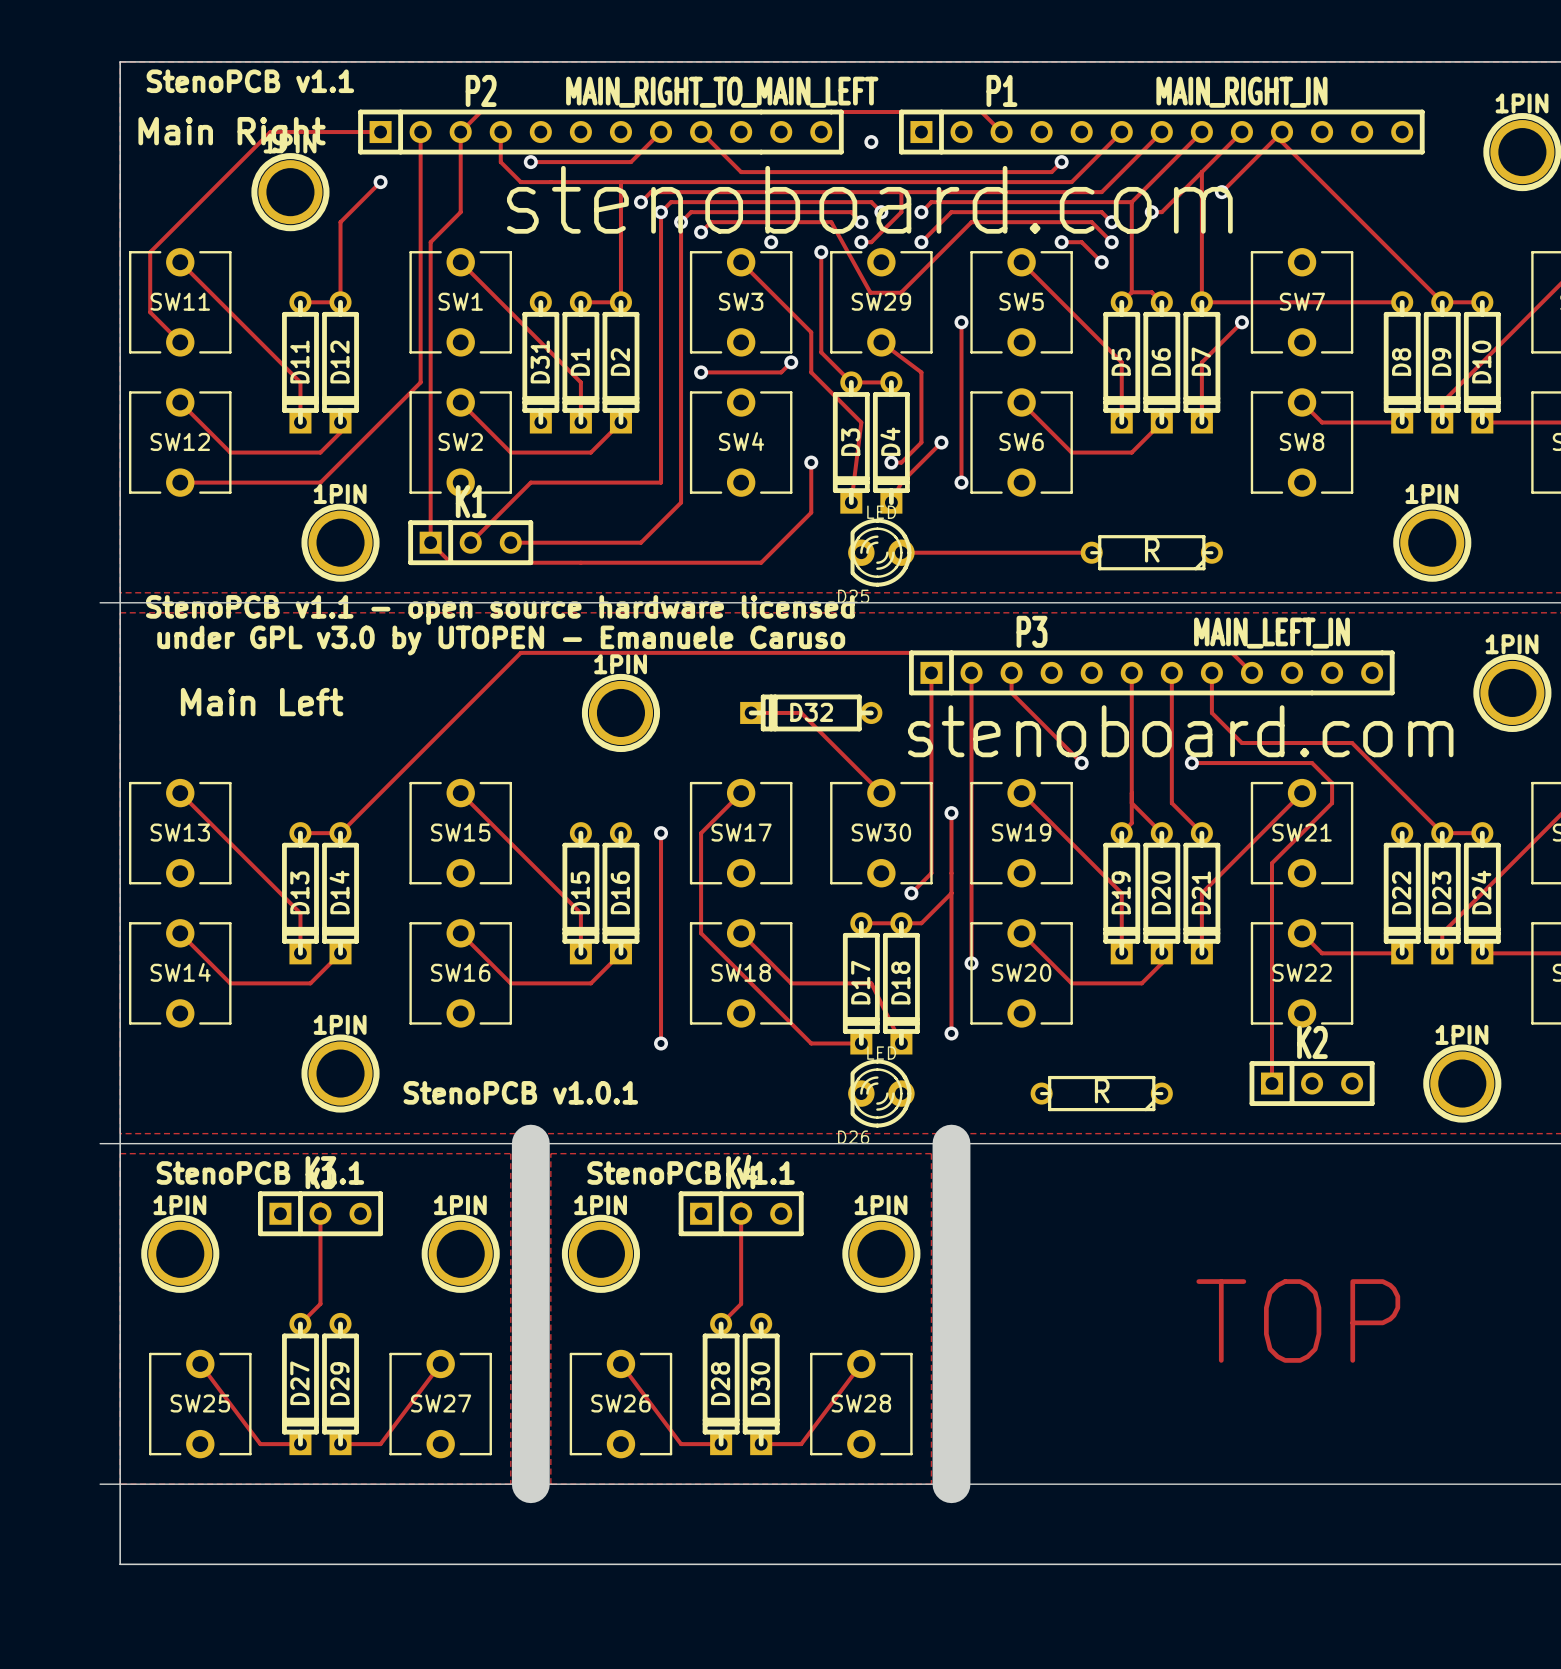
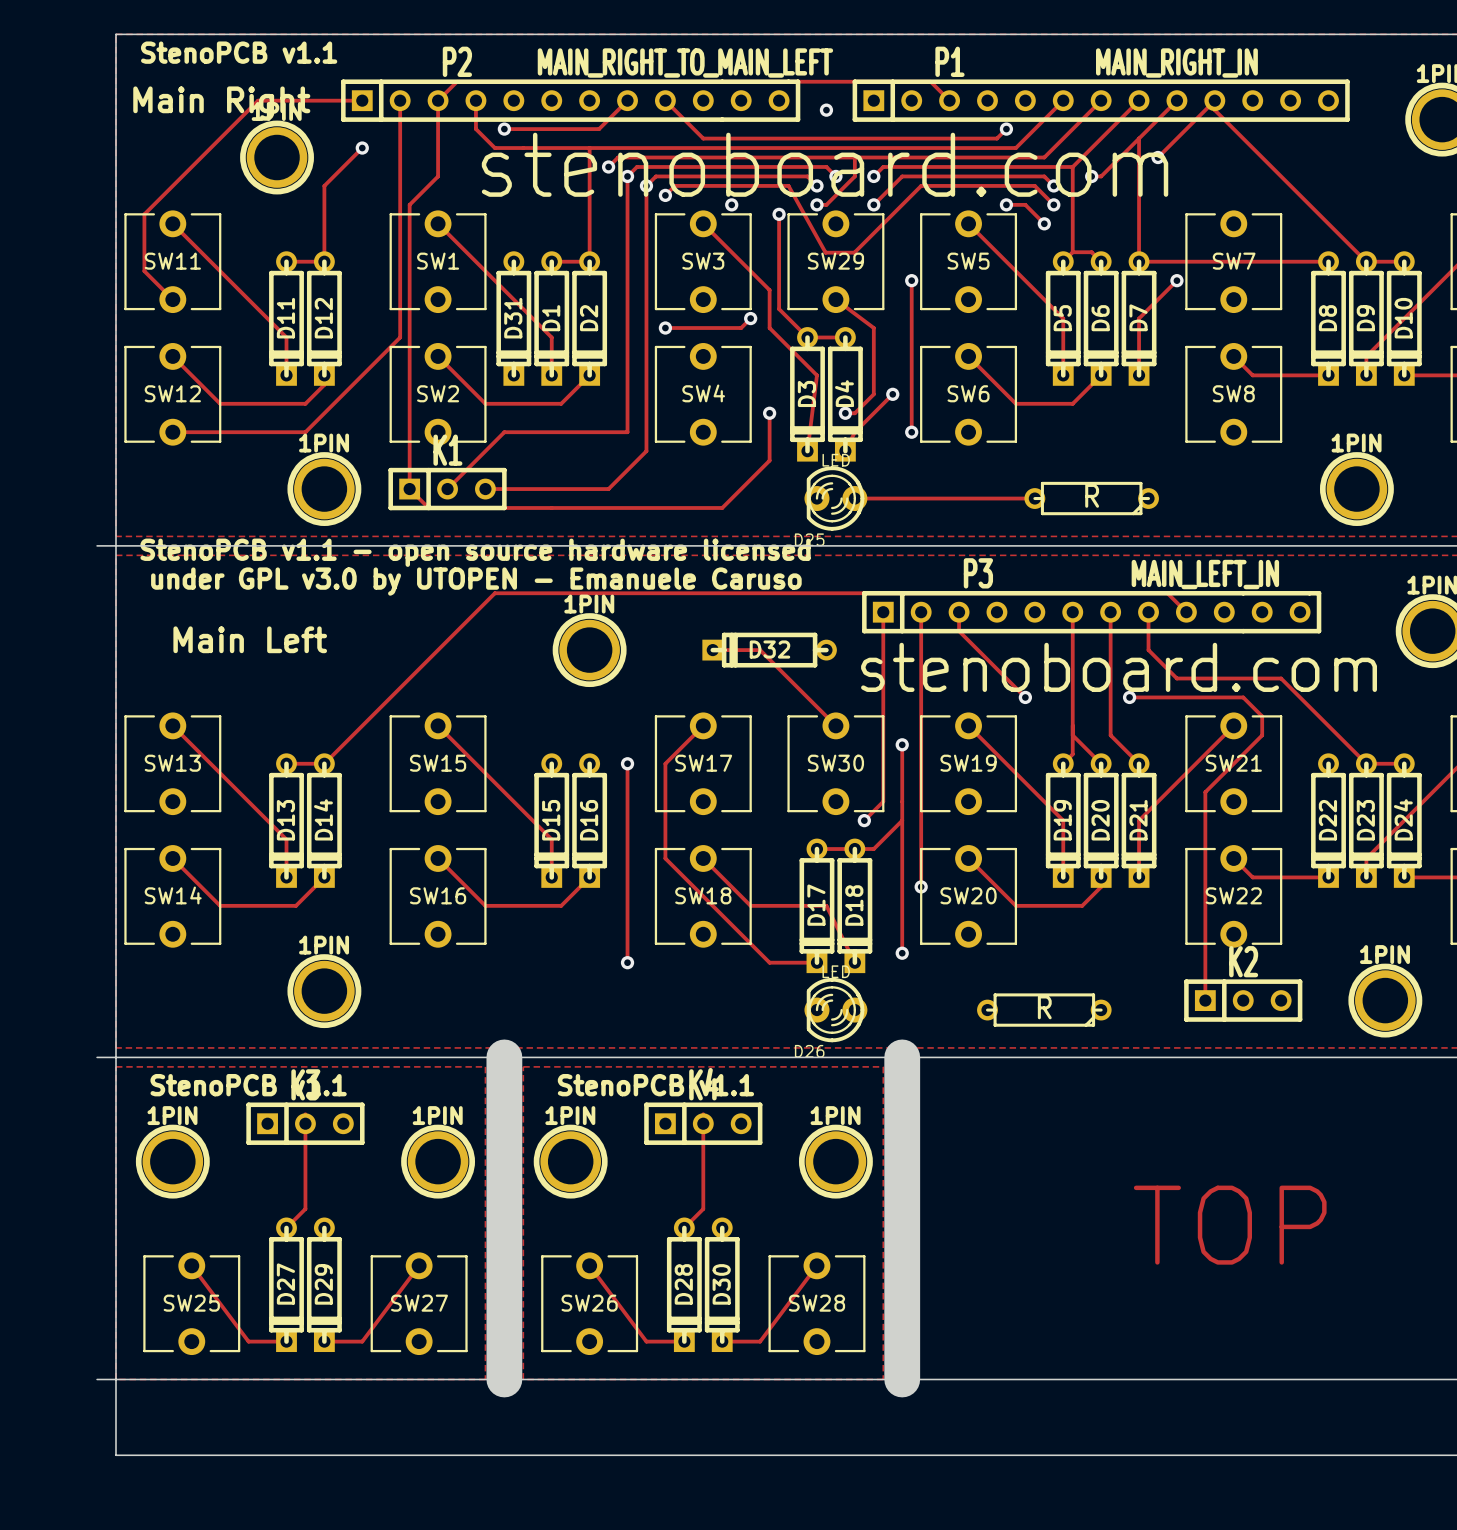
text: StenoPCB v1.0.1 (520, 1092) -> none

